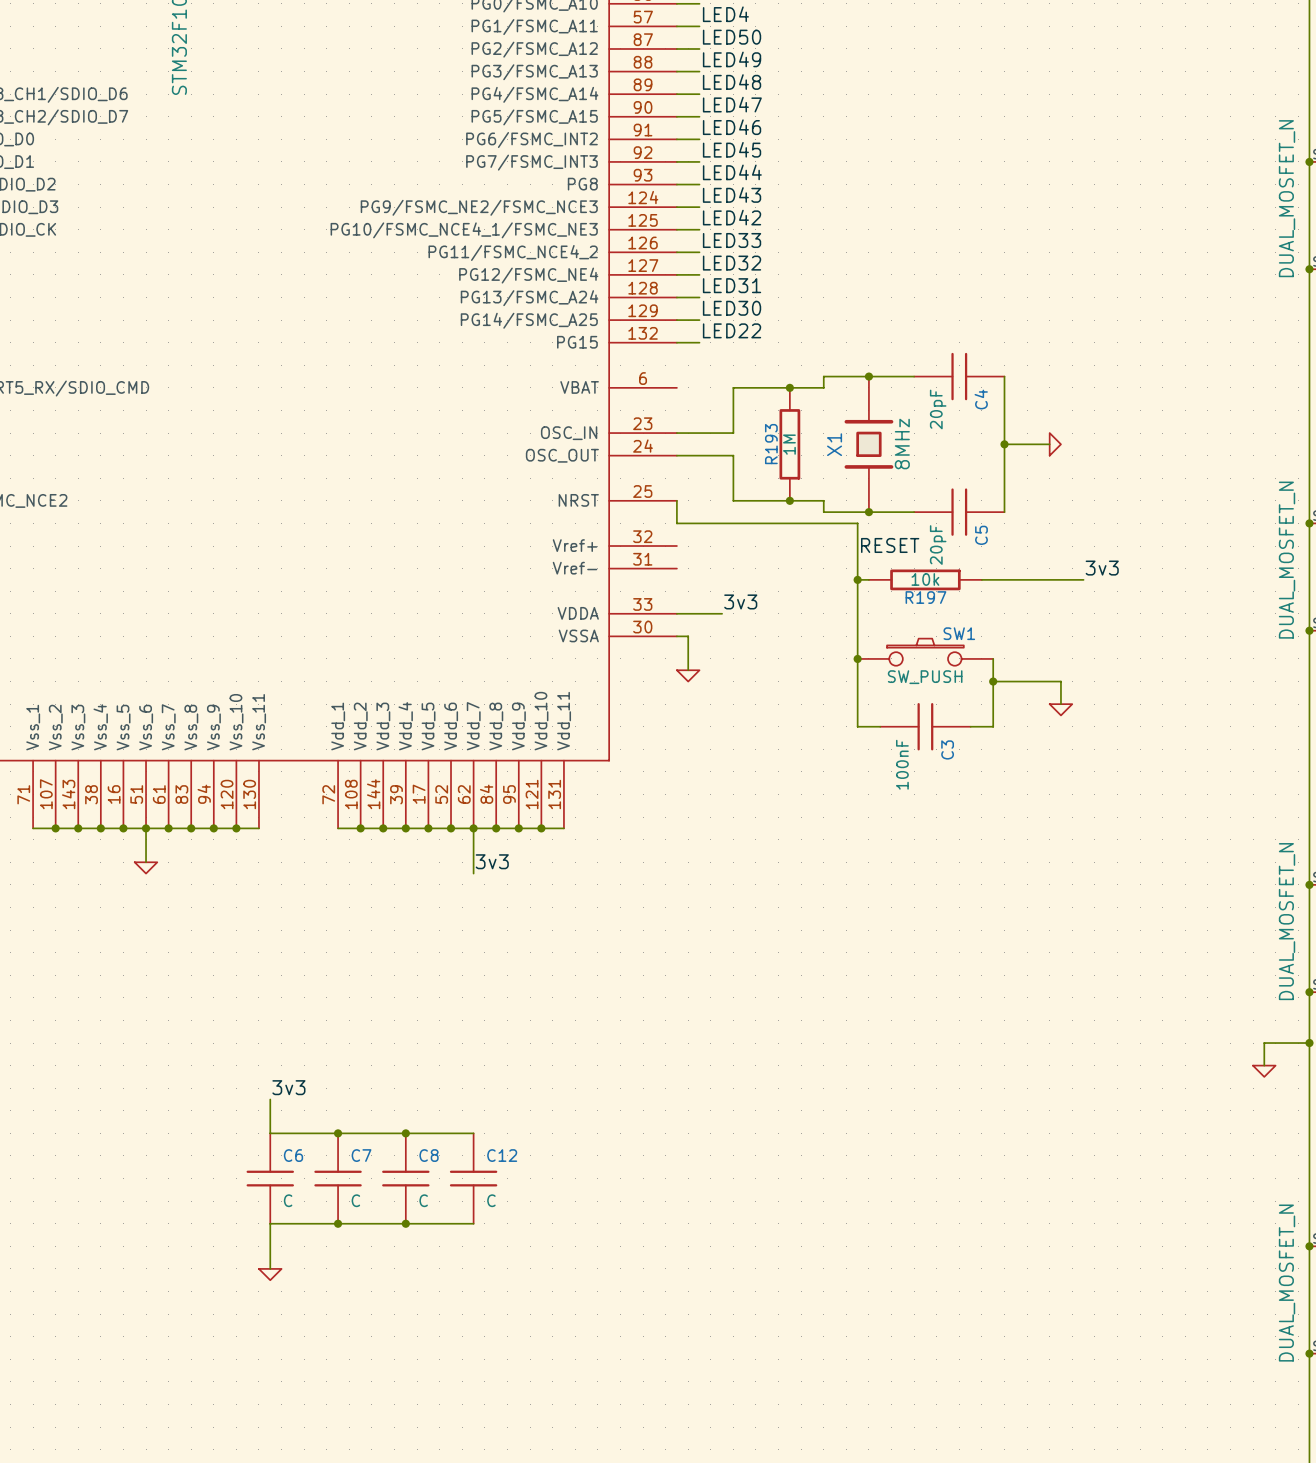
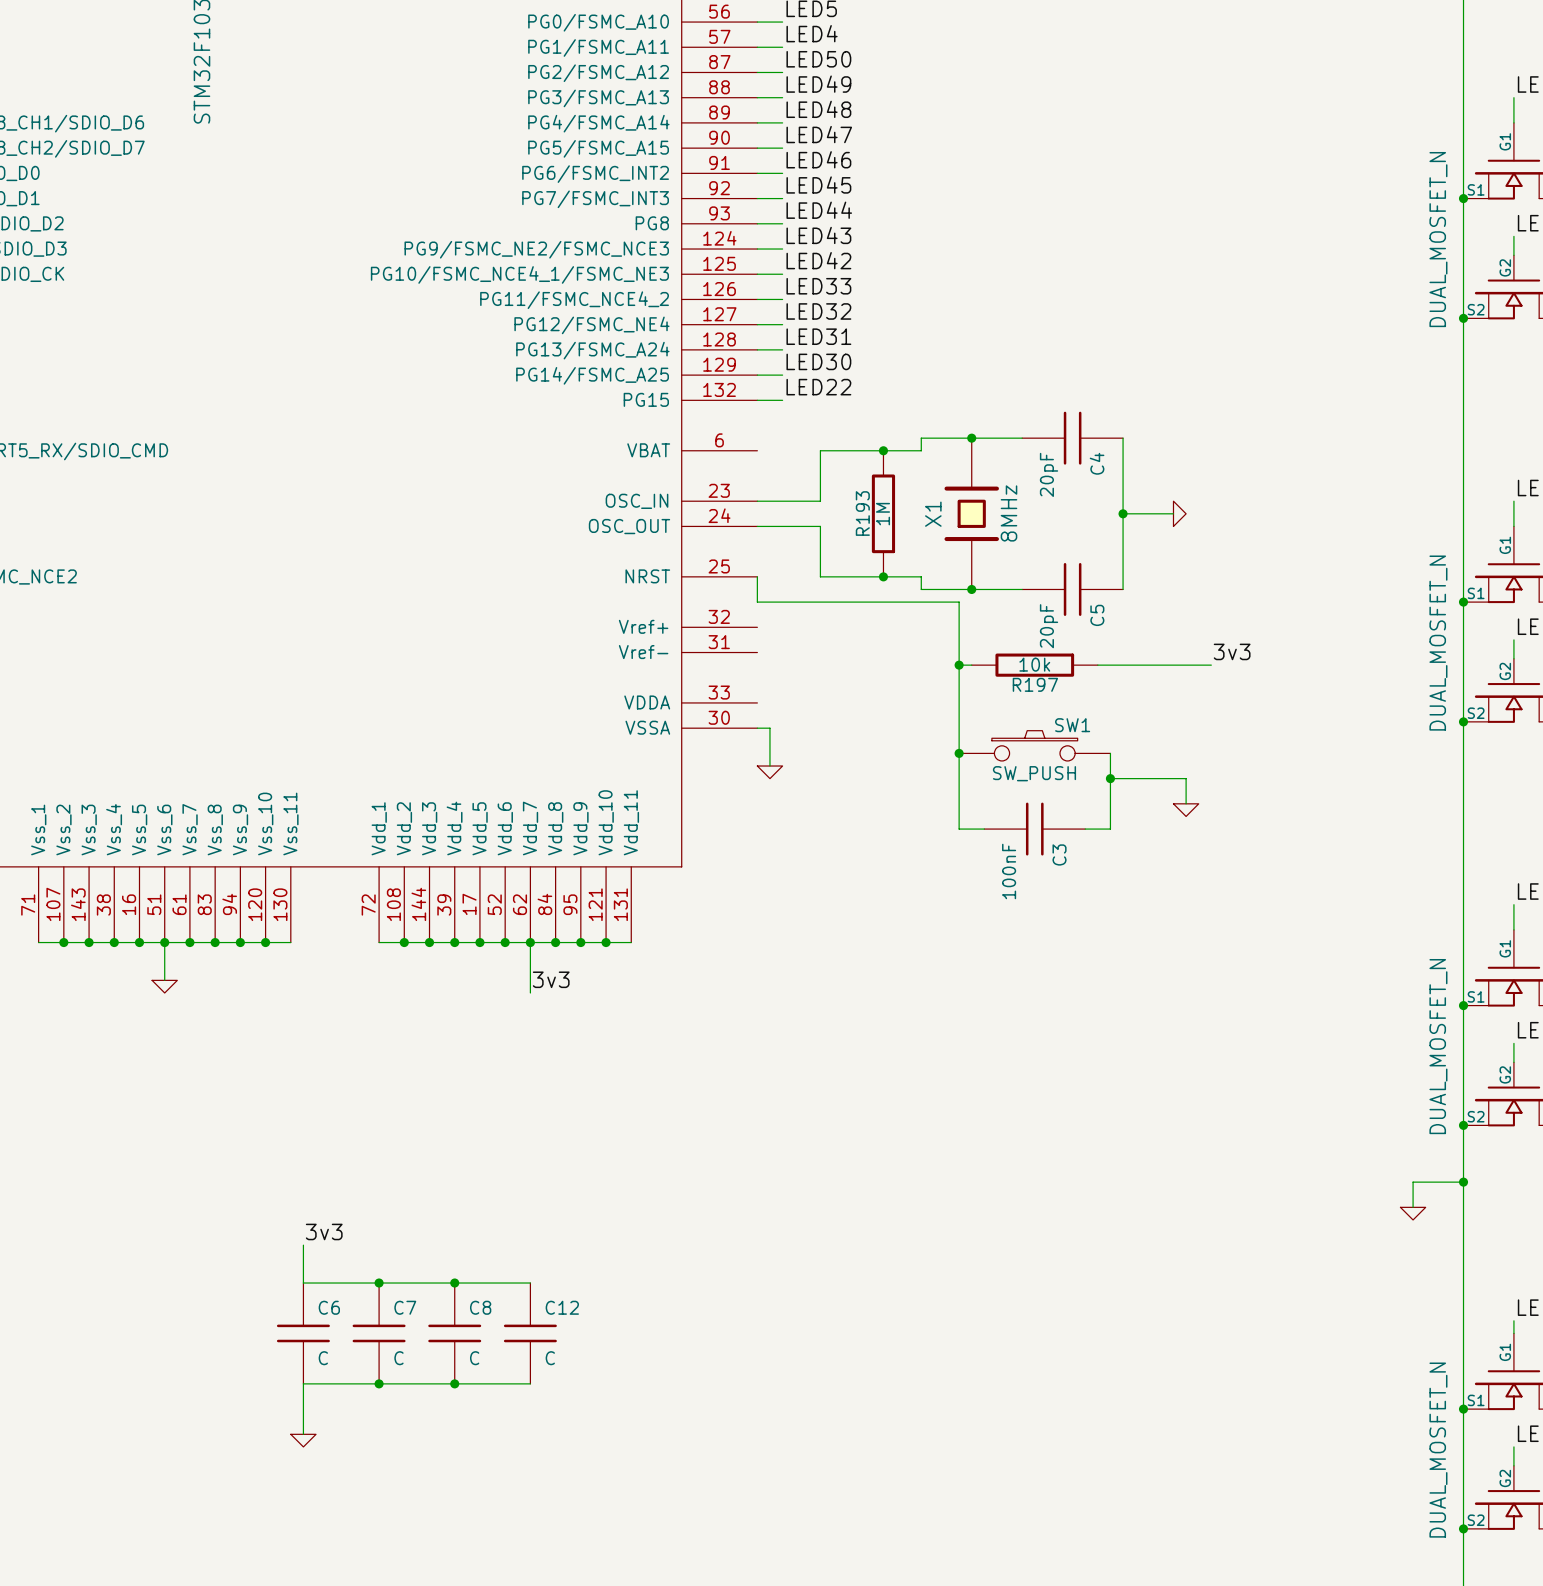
label: RESET (890, 545) -> none
label: 3v3 (740, 601) -> none
wire: (676, 613) (722, 613) -> none

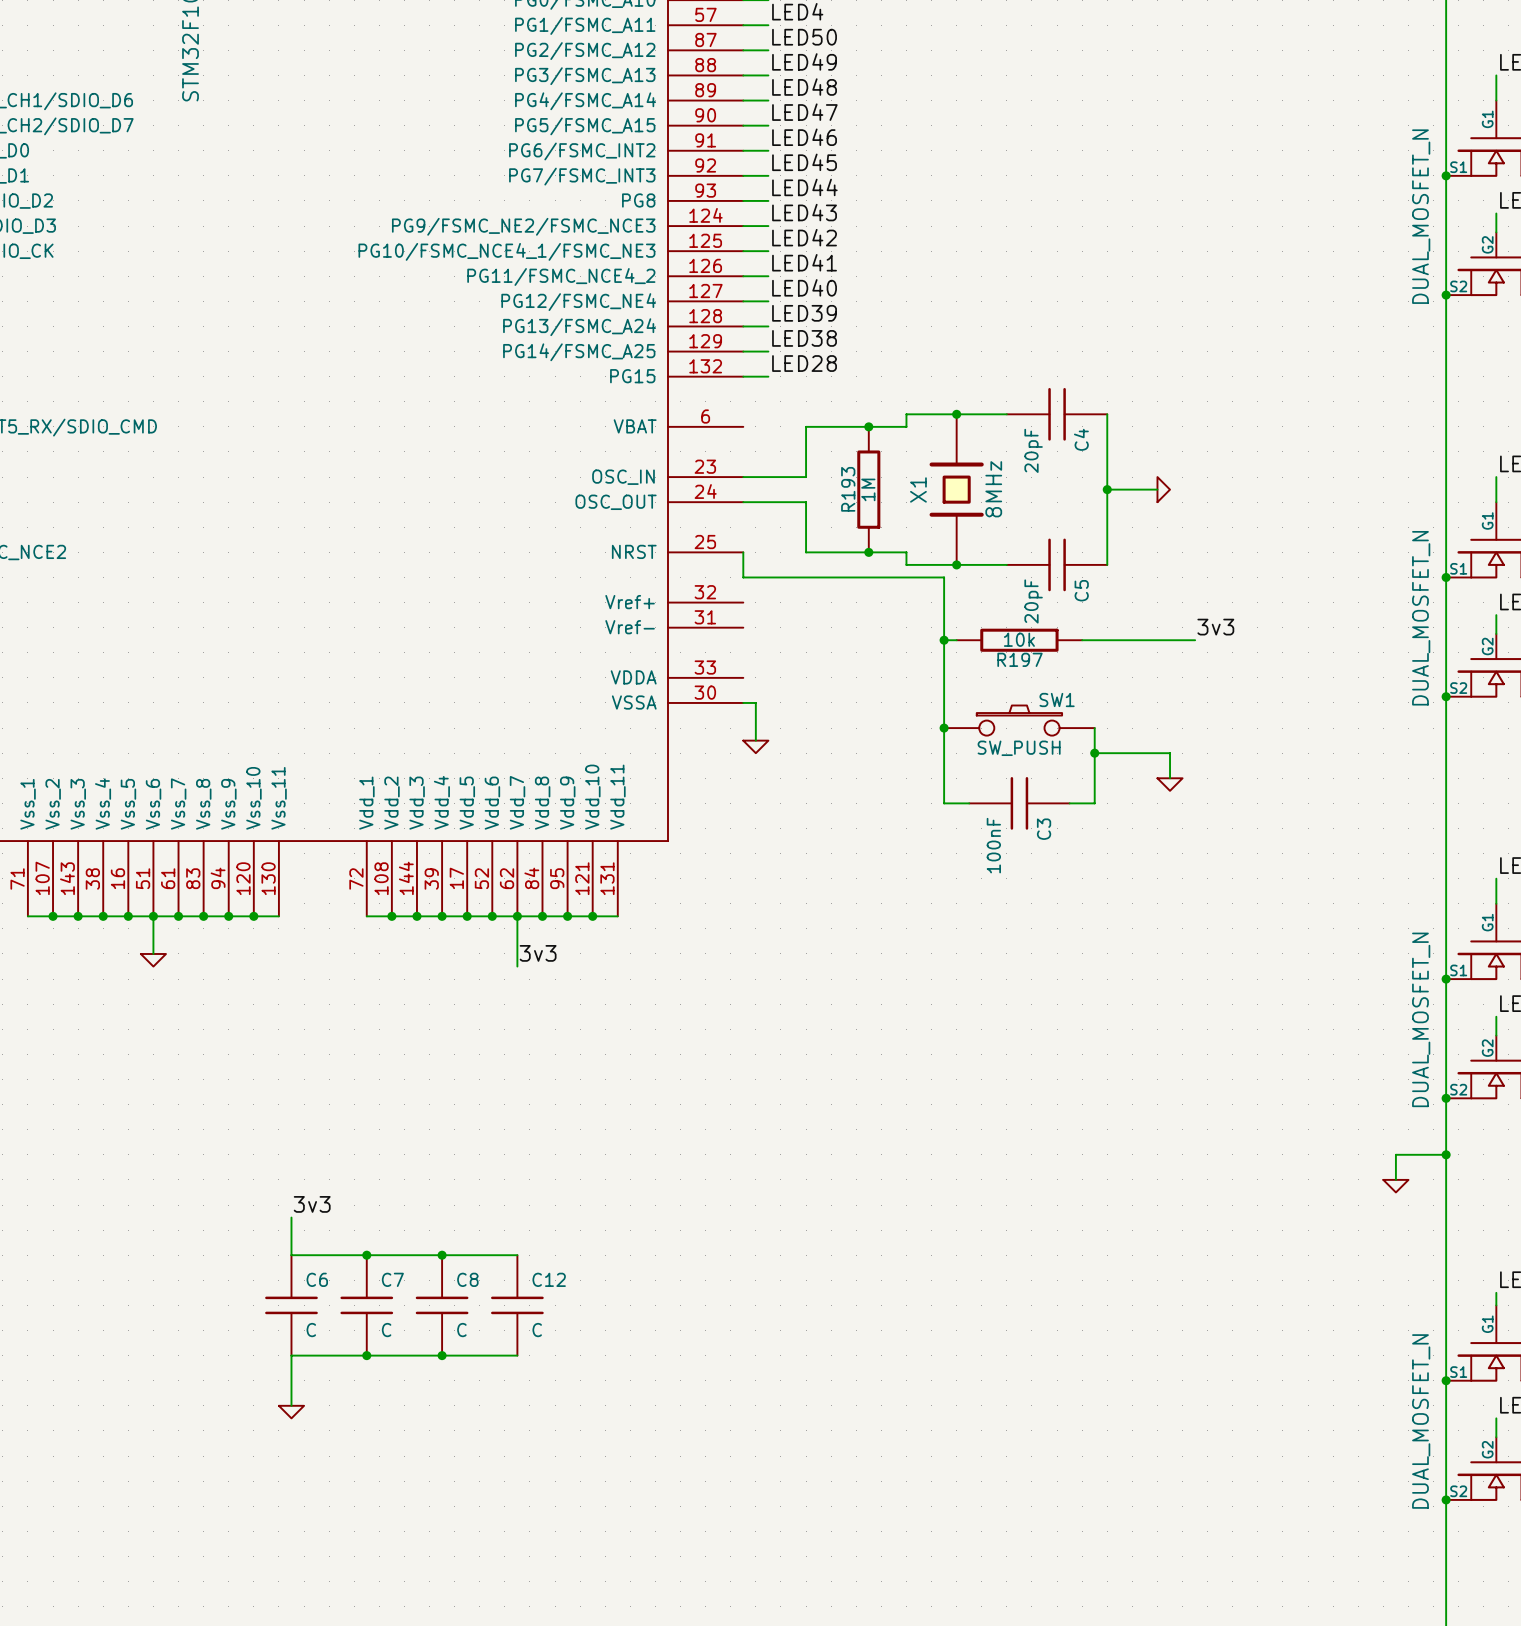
label: LED33 (818, 286) -> LED41 (804, 262)
label: LED32 (818, 311) -> LED40 (804, 287)
label: LED31 (818, 336) -> LED39 (804, 313)
label: LED30 (818, 361) -> LED38 (804, 338)
label: LED22 (818, 387) -> LED28 (804, 363)

